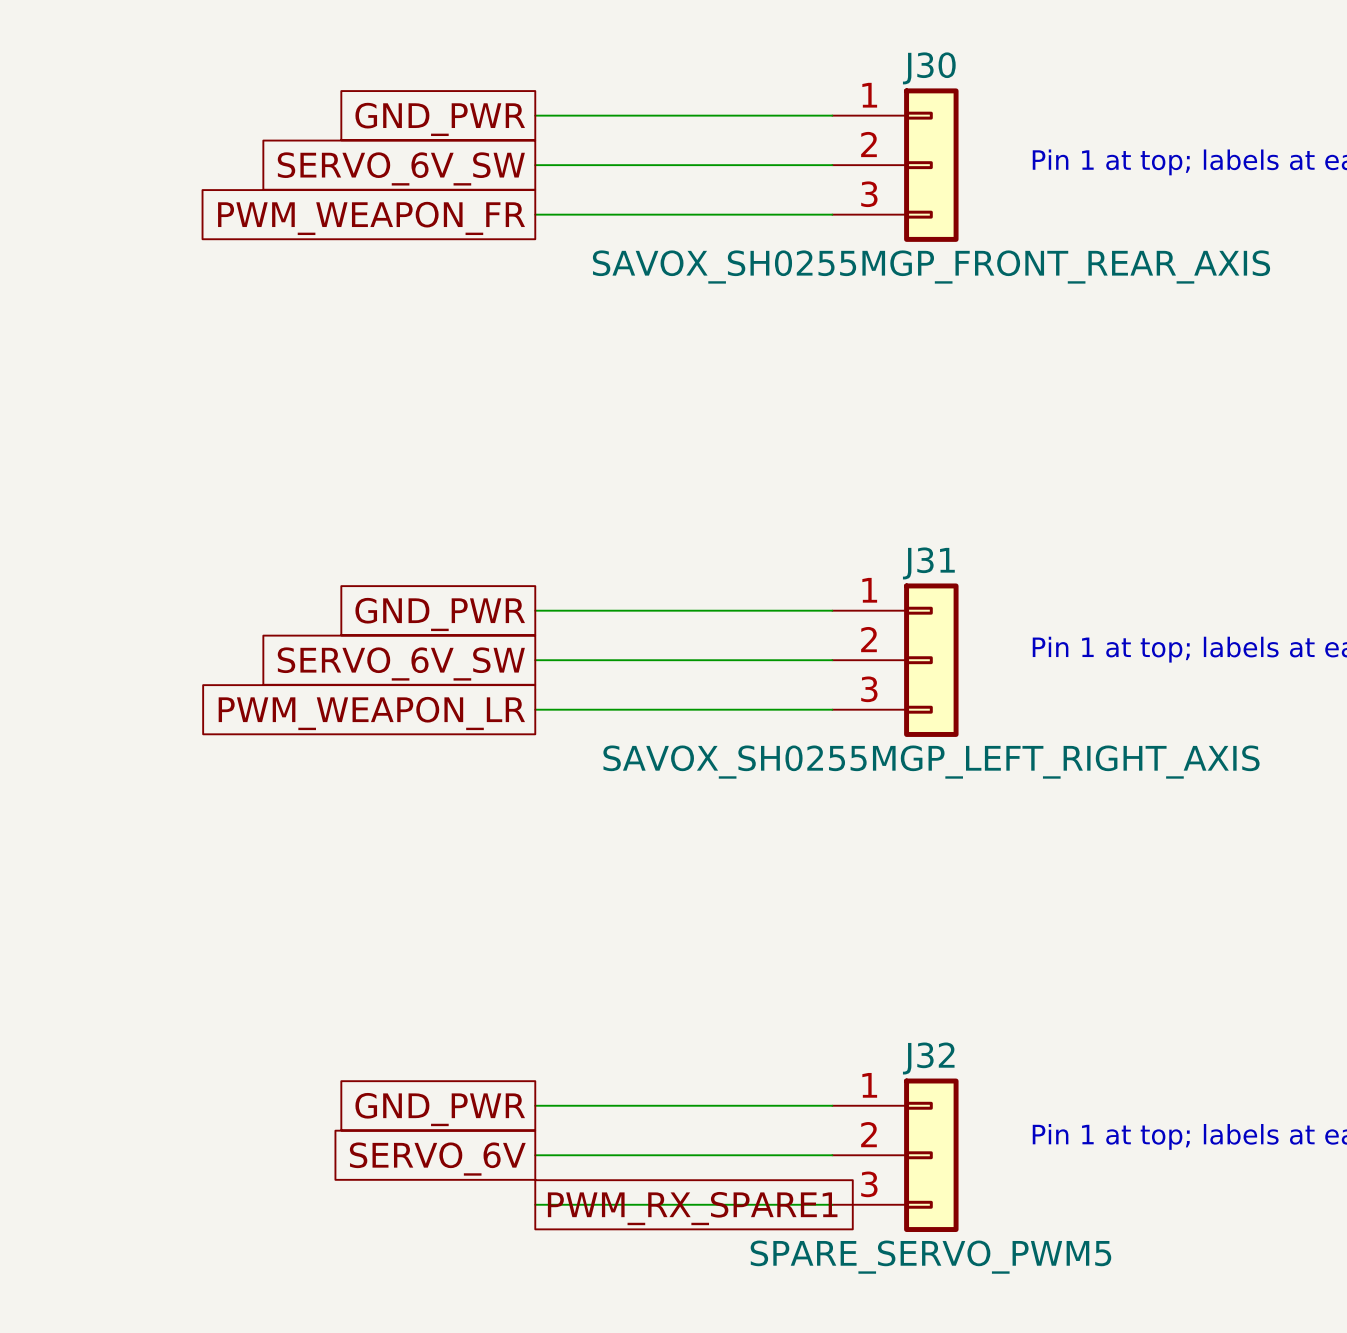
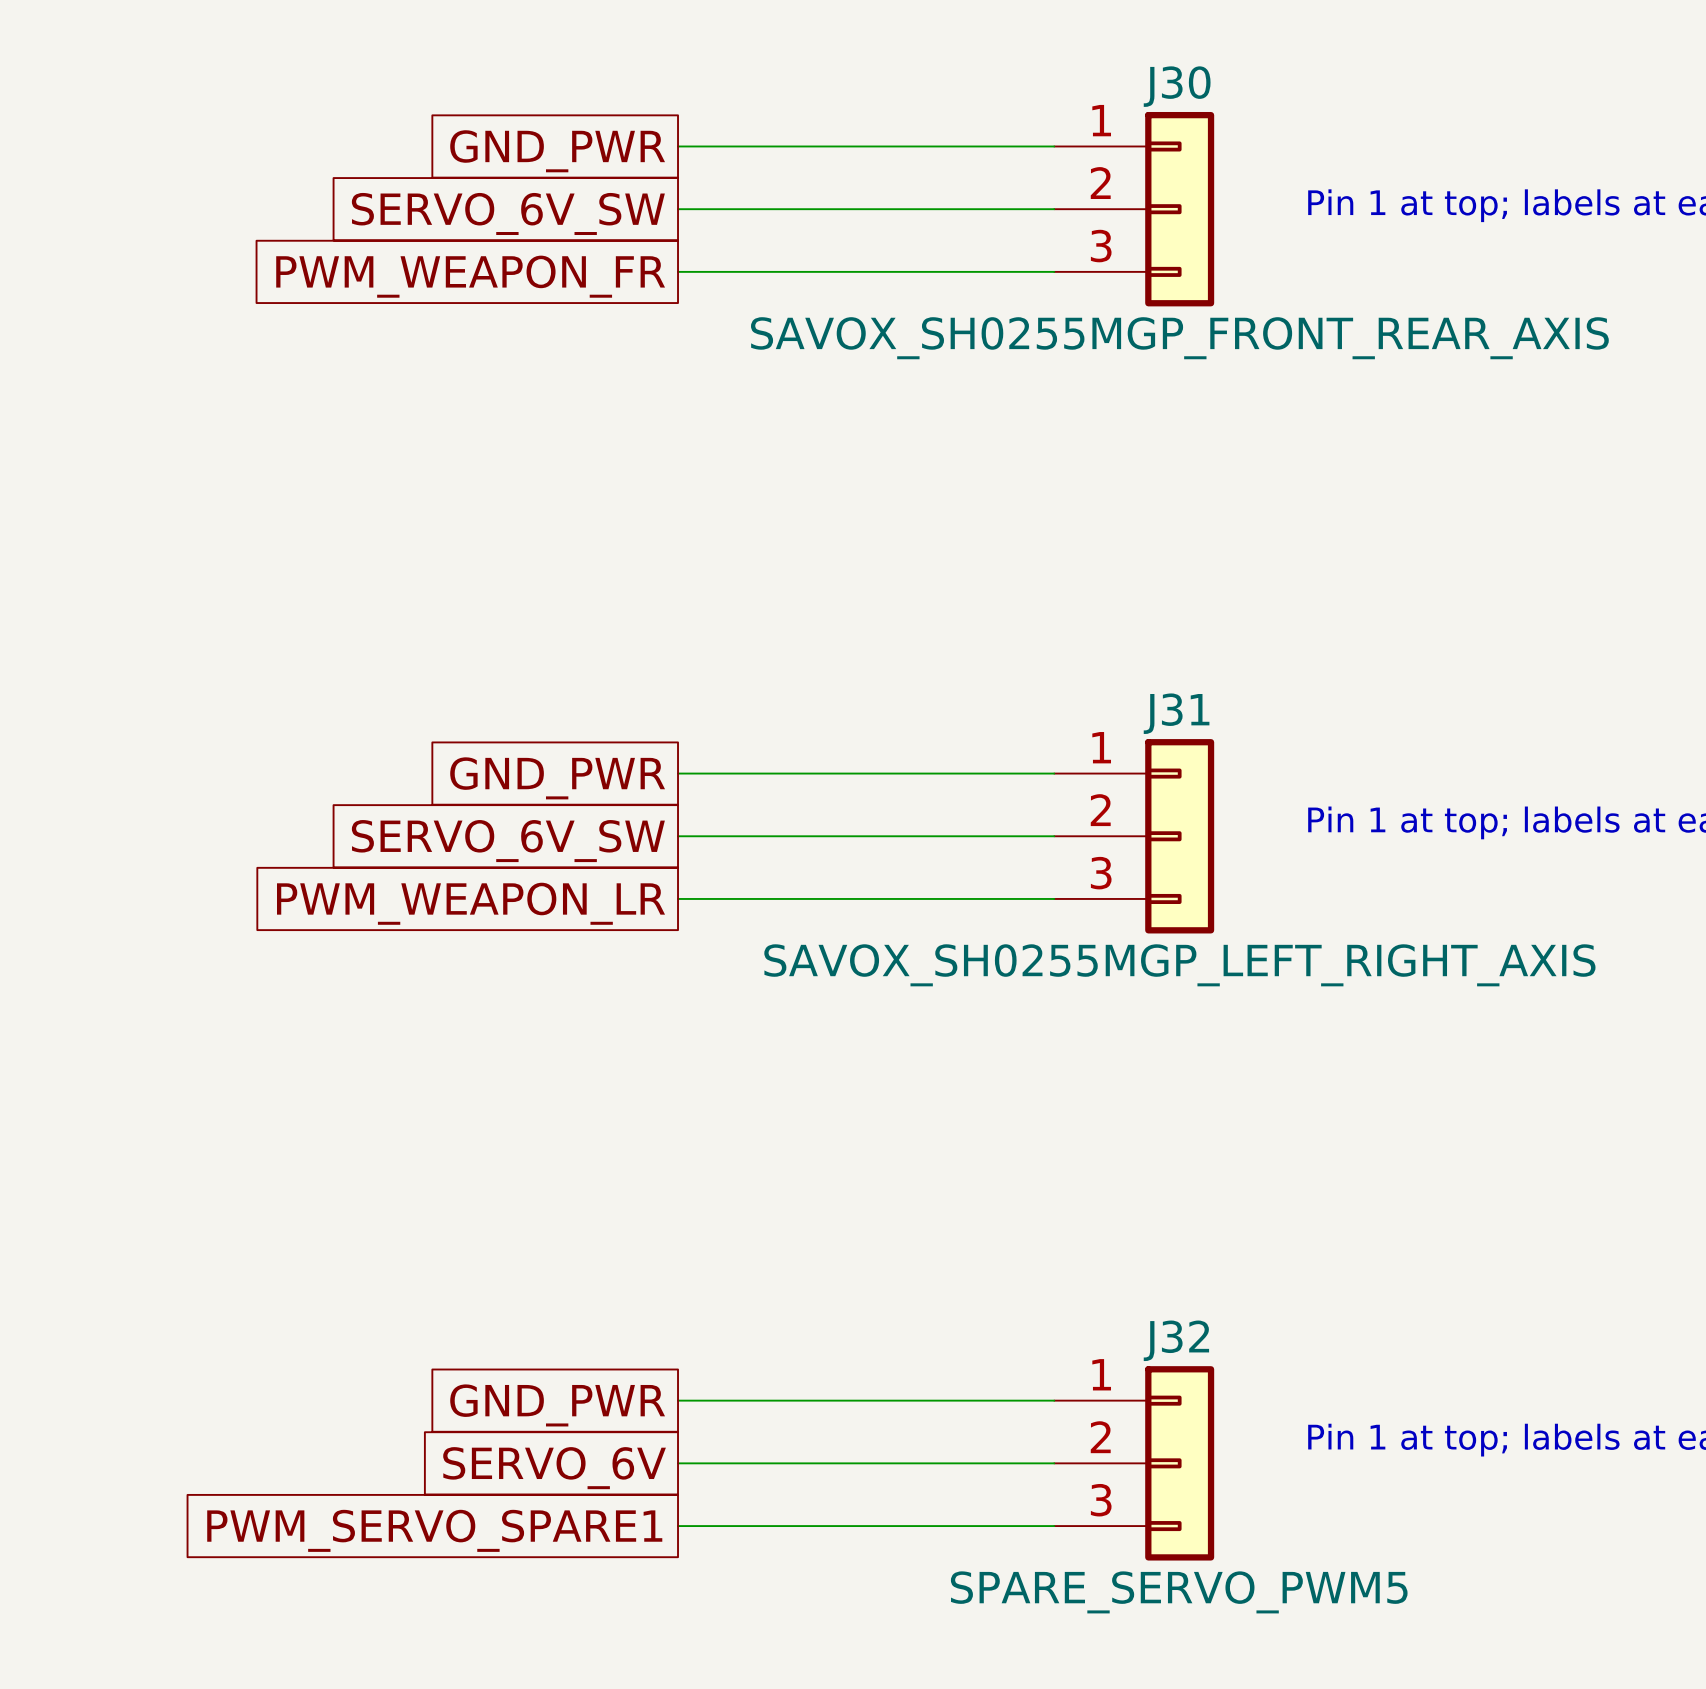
global label: PWM_RX_SPARE1 (692, 1208) -> PWM_SERVO_SPARE1 (434, 1530)

